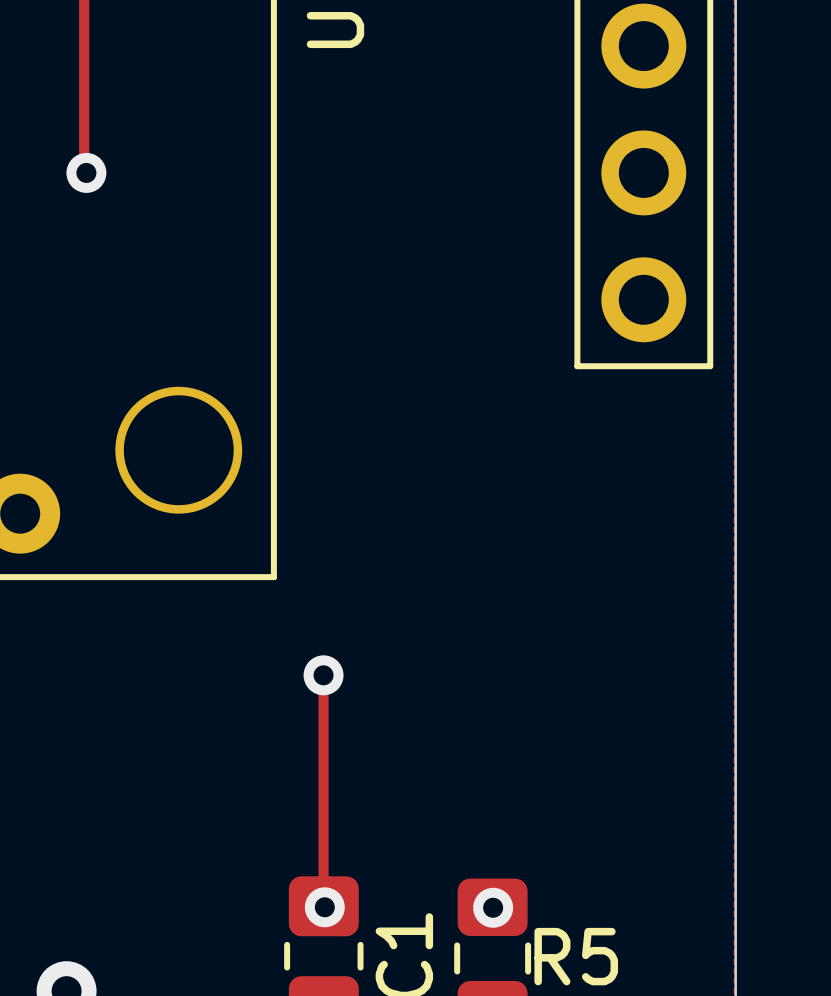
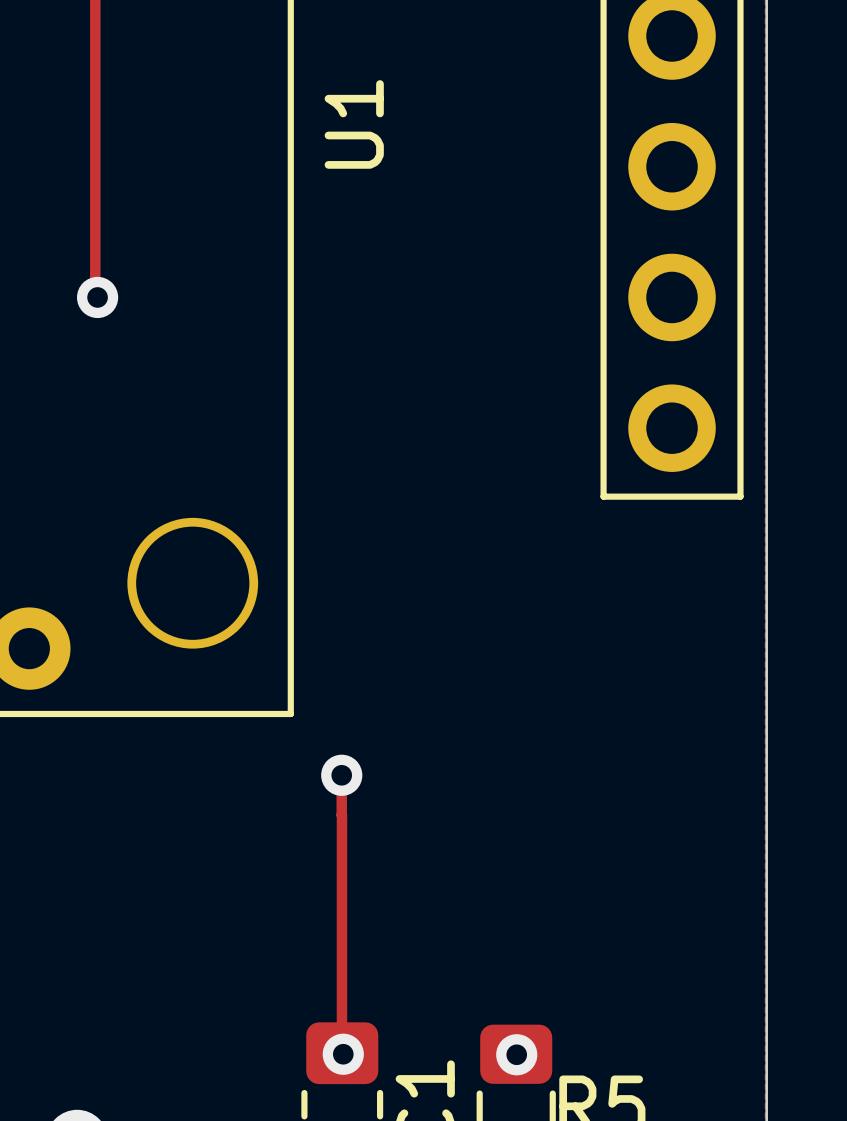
via position: (323, 675) -> (341, 775)

